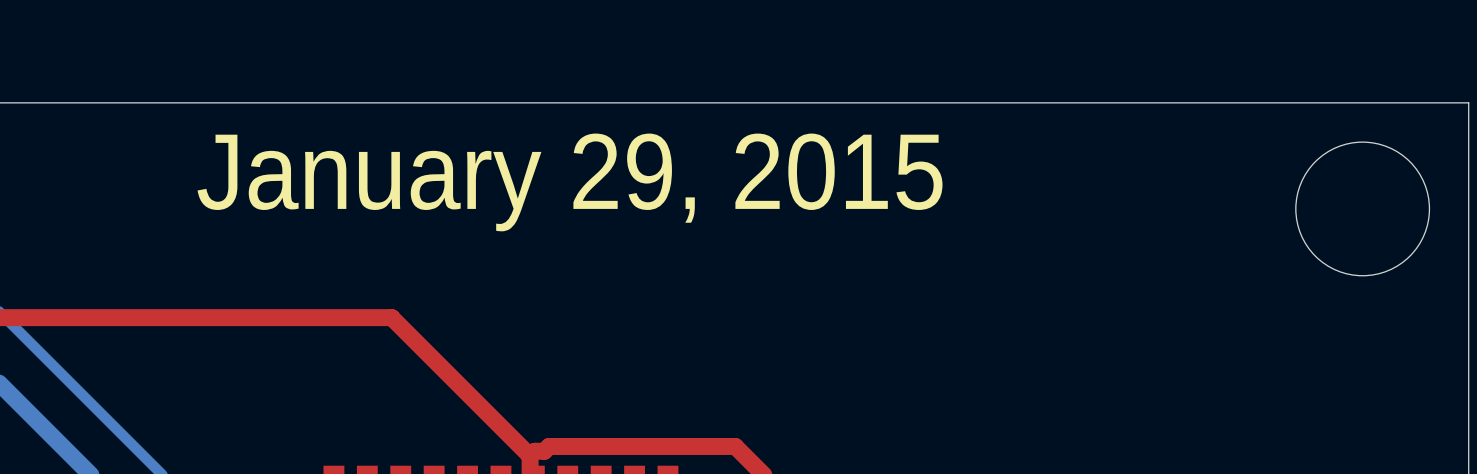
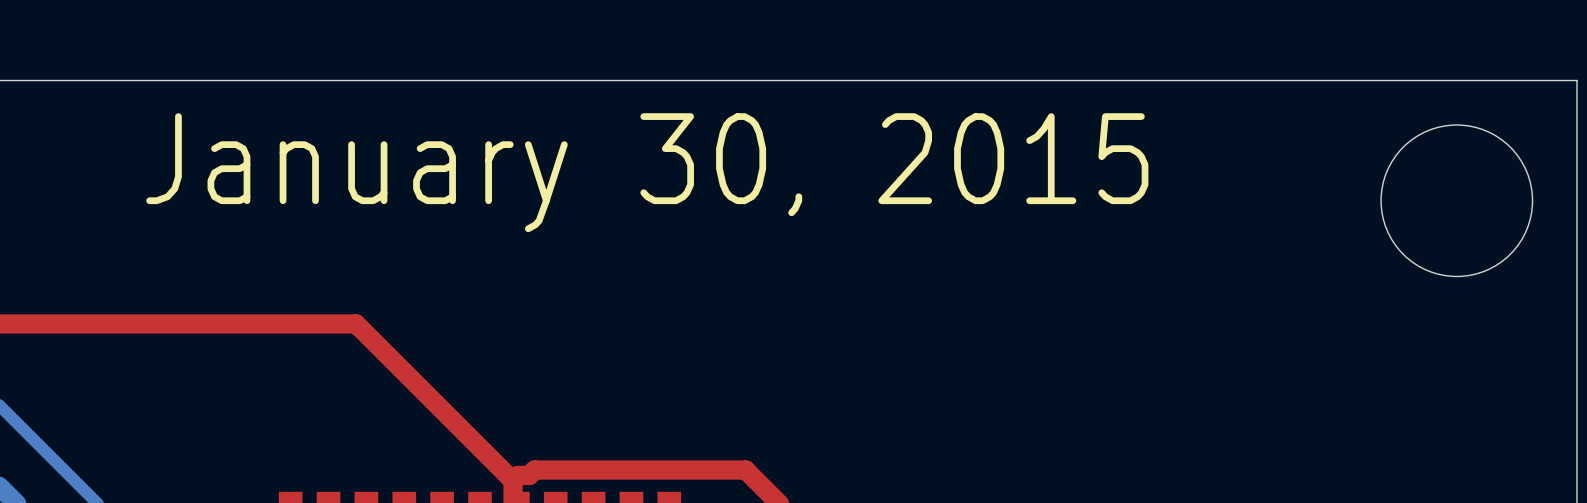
text: January 29, 2015 (570, 182) -> January 30, 2015 (647, 172)

